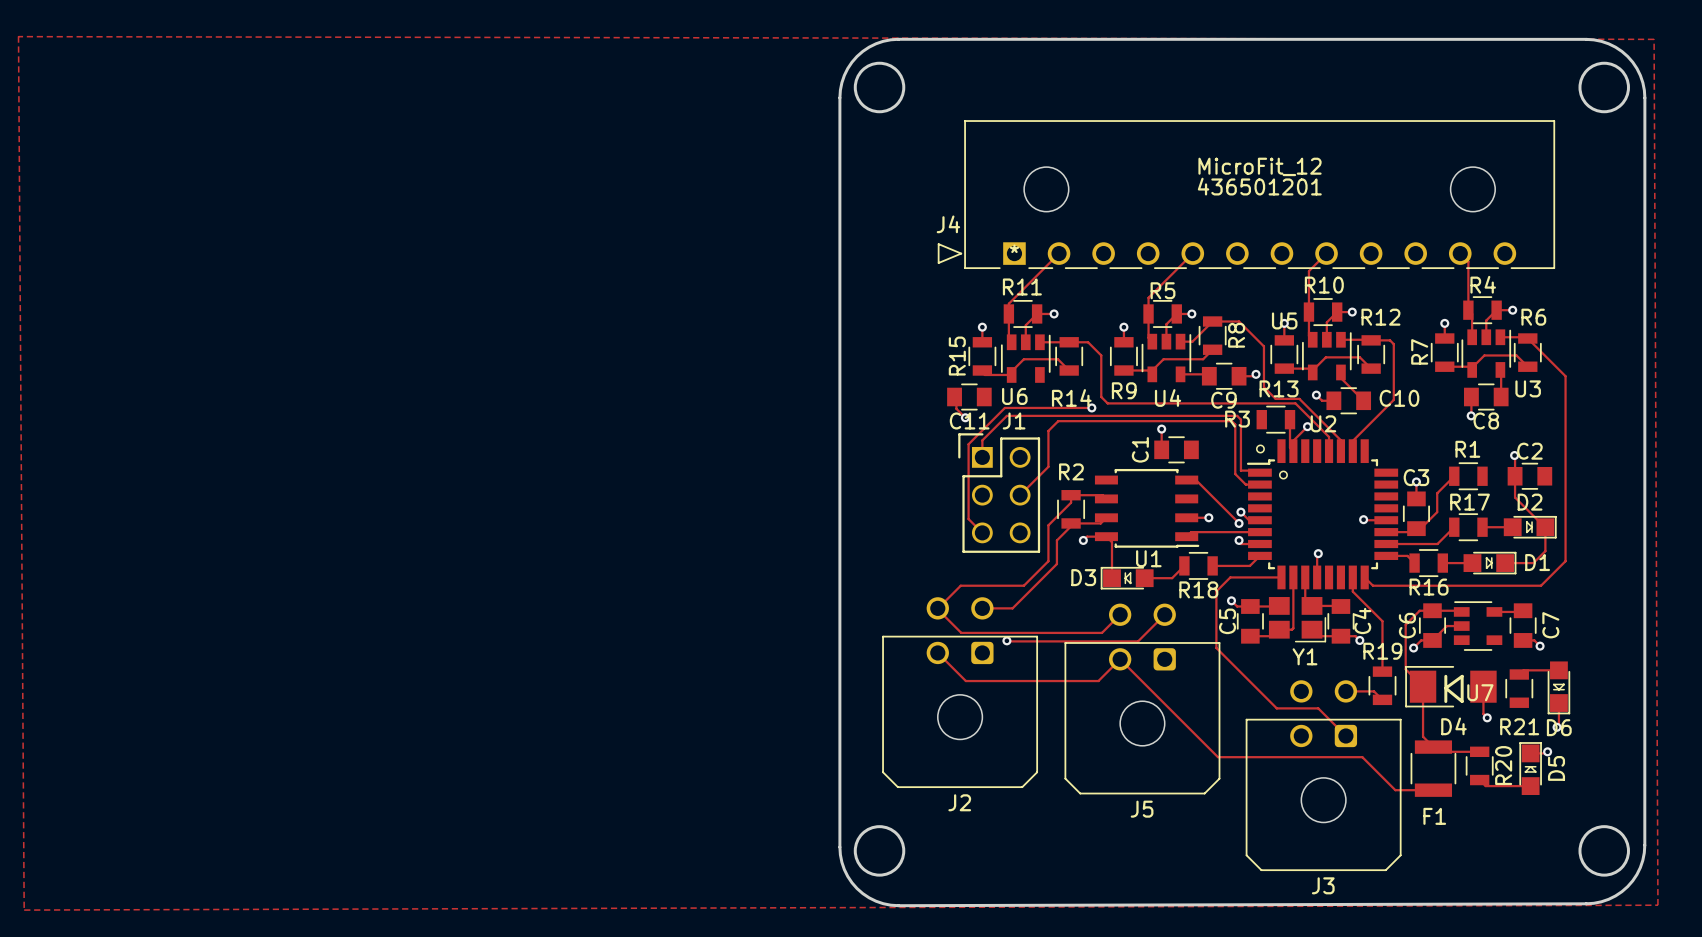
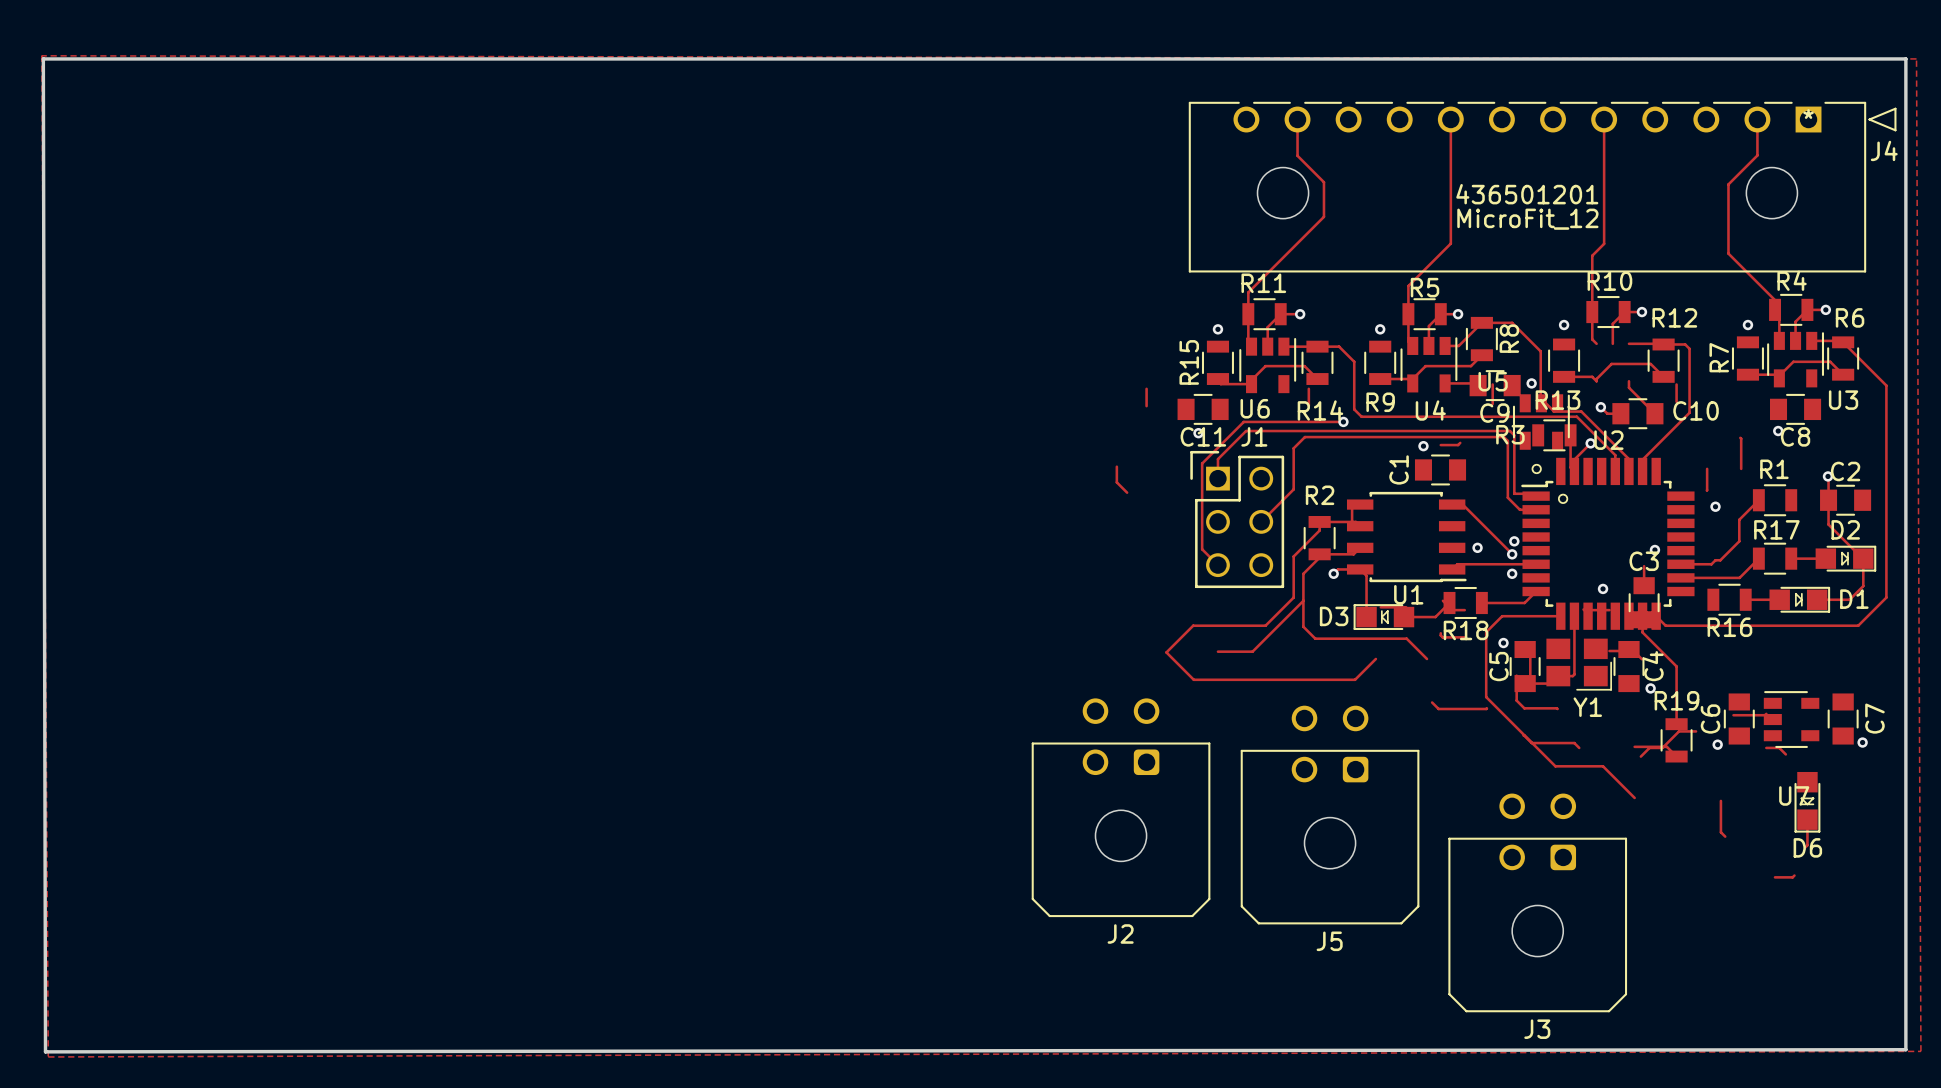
board edge: none -> (43, 58) (45, 1051) (1905, 1049) (1905, 58) (43, 58)
board edge: (898, 39) (1586, 39) (1601, 41) (1615, 47) (1632, 62) (1640, 75) (1644, 97) (1644, 845) (1642, 860) (1636, 874) (1621, 891) (1608, 899) (1586, 903) (898, 905) (883, 903) (869, 897) (851, 882) (844, 869) (839, 847) (839, 97) (844, 75) (857, 56) (876, 43) (898, 39) -> none
round board edge: [853, 61, 906, 114] -> none
round board edge: [1578, 61, 1630, 114] -> none
track: none -> (1297, 119) (1297, 155) (1323, 182) (1323, 216) (1248, 292) (1248, 343) (1251, 346)
track: none -> (1450, 119) (1450, 243) (1408, 286) (1408, 341) (1412, 345)
track: none -> (1604, 119) (1604, 243) (1592, 255) (1592, 339) (1596, 343)
track: none -> (1757, 119) (1757, 155) (1728, 184) (1728, 253) (1775, 300) (1775, 309) (1779, 314) (1779, 340)
J4 rotation: 0° (1246, 194) -> 180° (1542, 187)
track: (1059, 253) (1008, 303) (1008, 339) (1011, 342) -> none
track: (1192, 253) (1148, 297) (1148, 337) (1152, 341) -> none
track: (1326, 253) (1308, 271) (1308, 336) (1312, 339) -> none
track: (1460, 253) (1468, 261) (1468, 310) (1472, 313) (1472, 337) -> none
via: none -> (1825, 309)
via: none -> (1641, 312)
via: none -> (1300, 314)
via: none -> (1458, 314)
via: none -> (1564, 325)
via: none -> (1747, 325)
via: none -> (1217, 329)
via: none -> (1380, 329)
R4 position: (1482, 310) -> (1791, 309)
track: (1512, 310) (1496, 310) (1486, 320) (1486, 337) -> (1825, 309) (1807, 309) (1795, 321) (1795, 340)
via: (1512, 310) -> none
R10 position: (1323, 312) -> (1608, 312)
track: (1352, 312) (1337, 312) (1326, 322) (1326, 339) -> (1641, 312) (1624, 312) (1612, 323) (1612, 343)
via: (1352, 312) -> none
R11 position: (1022, 313) -> (1264, 314)
track: (1054, 313) (1037, 313) (1025, 325) (1025, 342) -> (1300, 314) (1280, 314) (1267, 327) (1267, 346)
via: (1054, 313) -> none
R5 position: (1162, 313) -> (1424, 314)
track: (1191, 313) (1176, 313) (1166, 324) (1166, 341) -> (1458, 314) (1440, 314) (1428, 326) (1428, 345)
via: (1191, 313) -> none
via: none -> (1531, 383)
via: (1284, 323) -> none
via: (1444, 323) -> none
via: (982, 327) -> none
via: (1123, 327) -> none
R8 position: (1212, 335) -> (1481, 339)
track: (1500, 337) (1526, 337) (1565, 376) (1565, 561) (1541, 585) (1372, 585) (1364, 577) -> (1811, 340) (1841, 340) (1886, 385) (1886, 597) (1858, 625) (1665, 625) (1656, 616)
track: (1340, 339) (1390, 340) (1393, 344) (1393, 399) (1352, 440) (1352, 451) -> (1628, 343) (1685, 344) (1689, 348) (1689, 412) (1642, 459) (1642, 471)
track: (1180, 341) (1192, 341) (1212, 321) (1239, 321) (1263, 346) (1263, 387) (1275, 398) (1299, 398) (1340, 440) (1340, 451) -> (1445, 345) (1458, 345) (1481, 322) (1512, 322) (1540, 351) (1540, 398) (1554, 411) (1581, 411) (1628, 459) (1628, 471)
track: (1039, 342) (1088, 342) (1101, 355) (1101, 397) (1107, 403) (1295, 403) (1329, 436) (1329, 451) -> (1283, 346) (1339, 346) (1354, 361) (1354, 409) (1361, 416) (1576, 416) (1615, 455) (1615, 471)
via: none -> (1600, 407)
track: (1212, 349) (1203, 359) (1163, 359) (1152, 370) (1152, 374) (1148, 370) (1123, 370) -> (1481, 355) (1470, 366) (1425, 366) (1412, 379) (1412, 383) (1408, 379) (1380, 379)
R7 position: (1444, 352) -> (1747, 358)
R6 position: (1527, 352) -> (1843, 358)
U3 position: (1486, 353) -> (1795, 359)
R13 position: (1284, 354) -> (1564, 360)
R12 position: (1371, 354) -> (1663, 360)
R15 position: (982, 356) -> (1217, 362)
R14 position: (1069, 356) -> (1317, 362)
R9 position: (1123, 356) -> (1380, 362)
via: none -> (1343, 421)
U6 position: (1025, 358) -> (1267, 365)
U4 position: (1166, 358) -> (1428, 364)
via: none -> (1778, 431)
via: none -> (1198, 433)
track: (1444, 366) (1468, 366) (1472, 369) (1484, 355) (1516, 355) (1527, 366) -> (1747, 374) (1775, 374) (1779, 378) (1779, 375) (1793, 361) (1830, 361) (1843, 374)
track: (1284, 368) (1308, 368) (1312, 372) (1325, 357) (1359, 357) (1371, 368) -> (1564, 376) (1592, 376) (1596, 381) (1611, 363) (1650, 363) (1663, 376)
track: (982, 370) (984, 374) (1011, 374) (1011, 371) (1023, 359) (1057, 359) (1069, 370) -> (1217, 379) (1220, 384) (1251, 384) (1251, 380) (1265, 366) (1304, 366) (1317, 379)
track: (1340, 372) (1340, 378) (1363, 400) -> (1628, 381) (1628, 387) (1654, 413)
track: (1180, 374) (1207, 374) (1209, 376) -> (1445, 383) (1475, 383) (1478, 385)
via position: (1256, 374) -> (1423, 446)
via: none -> (1590, 443)
C9 position: (1224, 376) -> (1495, 385)
track: (1316, 395) (1322, 400) (1333, 400) -> (1600, 407) (1607, 413) (1620, 413)
via: (1316, 395) -> none
C11 position: (969, 397) -> (1203, 409)
C8 position: (1486, 397) -> (1795, 409)
C10 position: (1348, 400) -> (1637, 413)
via: none -> (1828, 476)
track: (1091, 407) (1004, 407) (968, 444) (968, 519) (982, 532) -> (1343, 421) (1243, 421) (1202, 463) (1202, 549) (1217, 565)
via: (1091, 407) -> none
via position: (1471, 415) -> (1715, 506)
via: (965, 417) -> none
R3 position: (1275, 419) -> (1554, 435)
track: (1290, 419) (1290, 447) (1293, 451) (1293, 440) (1307, 426) -> (1570, 435) (1570, 467) (1574, 471) (1574, 459) (1590, 443)
via: (1307, 426) -> none
via: (1161, 429) -> none
C1 position: (1176, 449) -> (1440, 469)
track: (1514, 455) (1515, 497) (1545, 527) (1545, 551) (1533, 563) (1505, 563) (1507, 565) -> (1828, 476) (1828, 524) (1863, 558) (1863, 586) (1849, 599) (1817, 599) (1820, 602)
via: (1514, 455) -> none
track: (982, 457) (982, 440) (1006, 415) (1237, 415) (1240, 419) (1240, 470) (1257, 470) (1259, 472) -> (1217, 478) (1217, 459) (1246, 431) (1510, 431) (1514, 435) (1514, 493) (1533, 493) (1536, 496)
via: none -> (1514, 541)
track: none -> (1360, 547) (1353, 554) (1319, 554) (1319, 557) (1303, 573) (1303, 626) (1315, 638) (1406, 638) (1426, 658)
via: none -> (1477, 547)
via: none -> (1512, 554)
track: (1454, 476) (1437, 493) (1437, 512) (1420, 528) (1416, 528) (1412, 532) (1386, 532) -> (1758, 500) (1739, 519) (1739, 541) (1720, 560) (1715, 560) (1711, 564) (1680, 564)
R1 position: (1468, 476) -> (1775, 500)
C2 position: (1529, 476) -> (1845, 500)
track: (1186, 480) (1195, 480) (1239, 523) -> (1452, 504) (1462, 504) (1512, 553)
via position: (1416, 481) -> (1654, 550)
track: (1259, 484) (1245, 484) (1235, 474) (1235, 424) (1231, 421) (1058, 421) (1048, 430) (1048, 466) (1020, 495) -> (1536, 509) (1519, 509) (1507, 497) (1507, 440) (1503, 437) (1304, 437) (1293, 448) (1293, 489) (1261, 521)
via: none -> (1333, 573)
via: none -> (1512, 573)
J1 position: (999, 493) -> (1237, 519)
track: (1106, 498) (1102, 495) (1071, 495) (1071, 502) (1048, 525) (1048, 561) (1023, 585) (960, 585) (937, 609) (961, 632) (1101, 632) (1120, 614) -> (1360, 526) (1355, 521) (1319, 521) (1319, 530) (1293, 556) (1293, 597) (1265, 625) (1193, 625) (1166, 652) (1193, 679) (1355, 679) (1375, 658)
via: none -> (1603, 588)
U1 position: (1147, 508) -> (1406, 537)
R2 position: (1071, 509) -> (1319, 538)
track: none -> (1303, 600) (1252, 651) (1217, 651)
via: (1240, 512) -> none
U2 position: (1322, 514) -> (1607, 543)
track: (1106, 517) (1100, 523) (1071, 523) (1071, 526) (1056, 540) (1056, 564) (1012, 608) (982, 608) -> none
via: (1208, 517) -> none
via: (1363, 519) -> none
via: (1239, 523) -> none
track: (1454, 527) (1437, 544) (1386, 544) -> (1758, 558) (1739, 577) (1680, 577)
R17 position: (1468, 527) -> (1775, 558)
track: (1482, 527) (1512, 527) -> (1791, 558) (1825, 558)
D2 position: (1530, 527) -> (1845, 558)
track: (1259, 532) (1191, 532) (1186, 536) -> (1536, 564) (1457, 564) (1452, 569)
track: (1083, 540) (1087, 536) (1106, 536) (1111, 542) (1111, 578) -> (1333, 573) (1338, 569) (1360, 569) (1366, 575) (1366, 617)
via: (1083, 540) -> none
via: (1239, 540) -> none
via position: (1318, 553) -> (1503, 643)
track: (1259, 555) (1249, 565) (1212, 565) -> (1536, 591) (1524, 602) (1481, 602)
R16 position: (1428, 563) -> (1729, 599)
track: (1442, 563) (1472, 563) -> (1745, 599) (1779, 599)
D1 position: (1489, 563) -> (1799, 599)
track: (1184, 565) (1172, 578) (1144, 578) -> (1449, 602) (1435, 617) (1404, 617)
R18 position: (1198, 565) -> (1465, 602)
track: (1281, 577) (1230, 577) (1216, 591) (1216, 648) (1276, 708) (1318, 708) (1345, 735) -> (1560, 616) (1502, 616) (1486, 632) (1486, 697) (1555, 766) (1603, 766) (1634, 797)
track: (1293, 577) (1293, 628) (1279, 629) (1272, 636) (1250, 636) -> (1574, 616) (1574, 674) (1558, 676) (1550, 683) (1525, 683)
track: (1352, 577) (1352, 591) (1382, 621) (1382, 671) -> (1642, 616) (1642, 632) (1676, 666) (1676, 724)
D3 position: (1127, 578) -> (1383, 617)
via: none -> (1650, 688)
via: (1231, 600) -> none
track: (1461, 611) (1419, 610) (1405, 624) (1405, 669) (1423, 686) (1423, 736) (1438, 751) (1479, 751) -> none
track: (1164, 614) (1138, 641) (1006, 640) -> none
Y1 position: (1297, 619) -> (1579, 664)
C5 position: (1250, 621) -> (1525, 666)
C4 position: (1340, 621) -> (1628, 666)
C6 position: (1432, 625) -> (1739, 719)
C7 position: (1523, 625) -> (1843, 719)
U7 position: (1478, 626) -> (1791, 719)
via: none -> (1862, 742)
via: none -> (1717, 744)
via: (1006, 640) -> none
via: (1359, 640) -> none
via: (1540, 646) -> none
via: (1413, 648) -> none
track: (937, 652) (965, 681) (1098, 681) (1120, 659) (1217, 757) (1362, 757) (1395, 790) (1433, 790) -> none
track: (1558, 670) (1523, 670) (1519, 674) -> none
R19 position: (1382, 685) -> (1676, 740)
D4: (1450, 686) -> none
R21: (1519, 688) -> none
track: (1345, 691) (1374, 691) (1382, 699) -> (1634, 746) (1666, 746) (1676, 756)
via: (1487, 717) -> none
via: (1557, 727) -> none
via: (1547, 751) -> none
R20: (1479, 765) -> none
F1: (1433, 768) -> none
D5: (1530, 768) -> none
track: (1479, 780) (1485, 786) (1530, 786) -> none
round board edge: [853, 825, 906, 877] -> none
round board edge: [1578, 825, 1630, 877] -> none

